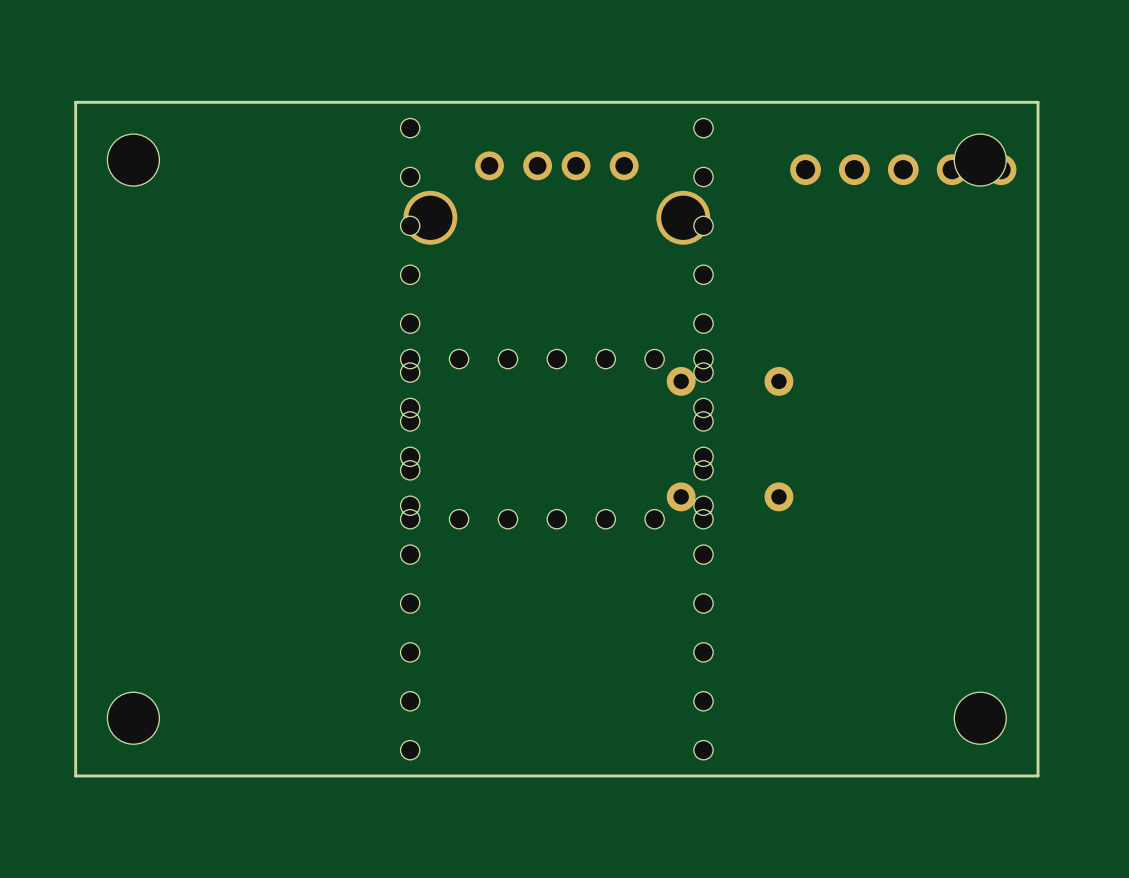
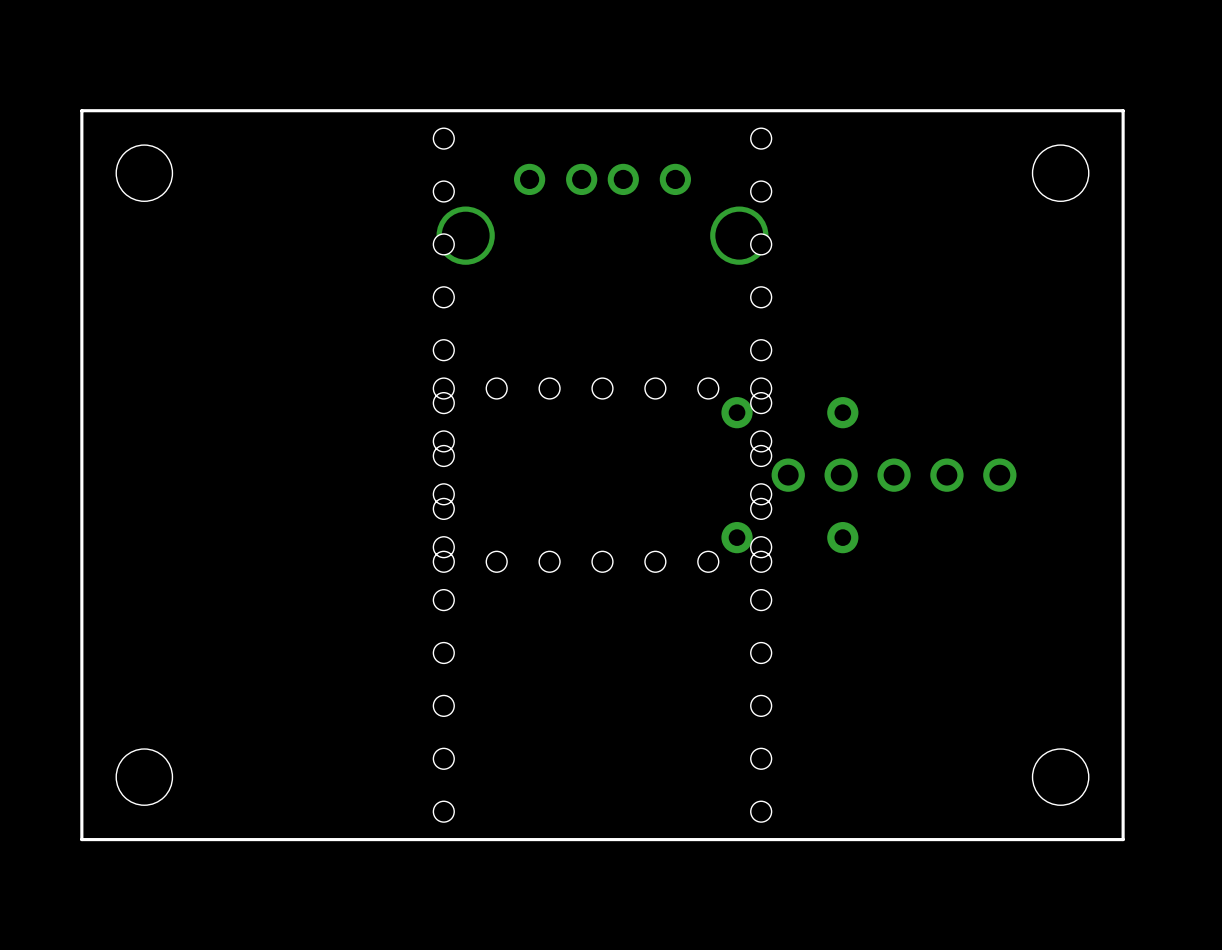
part position: (903, 169) -> (894, 475)

